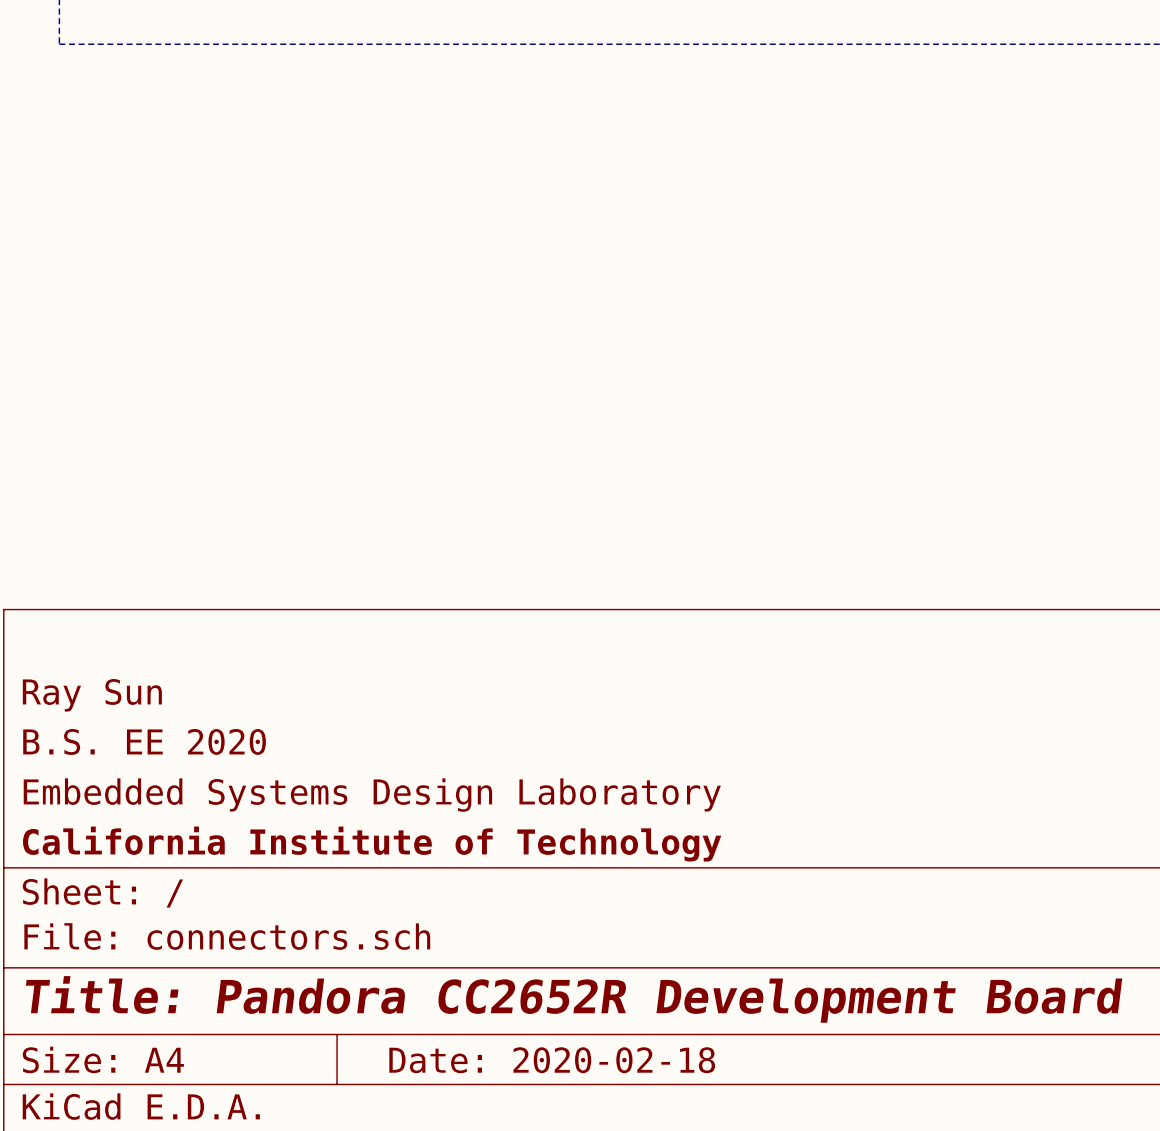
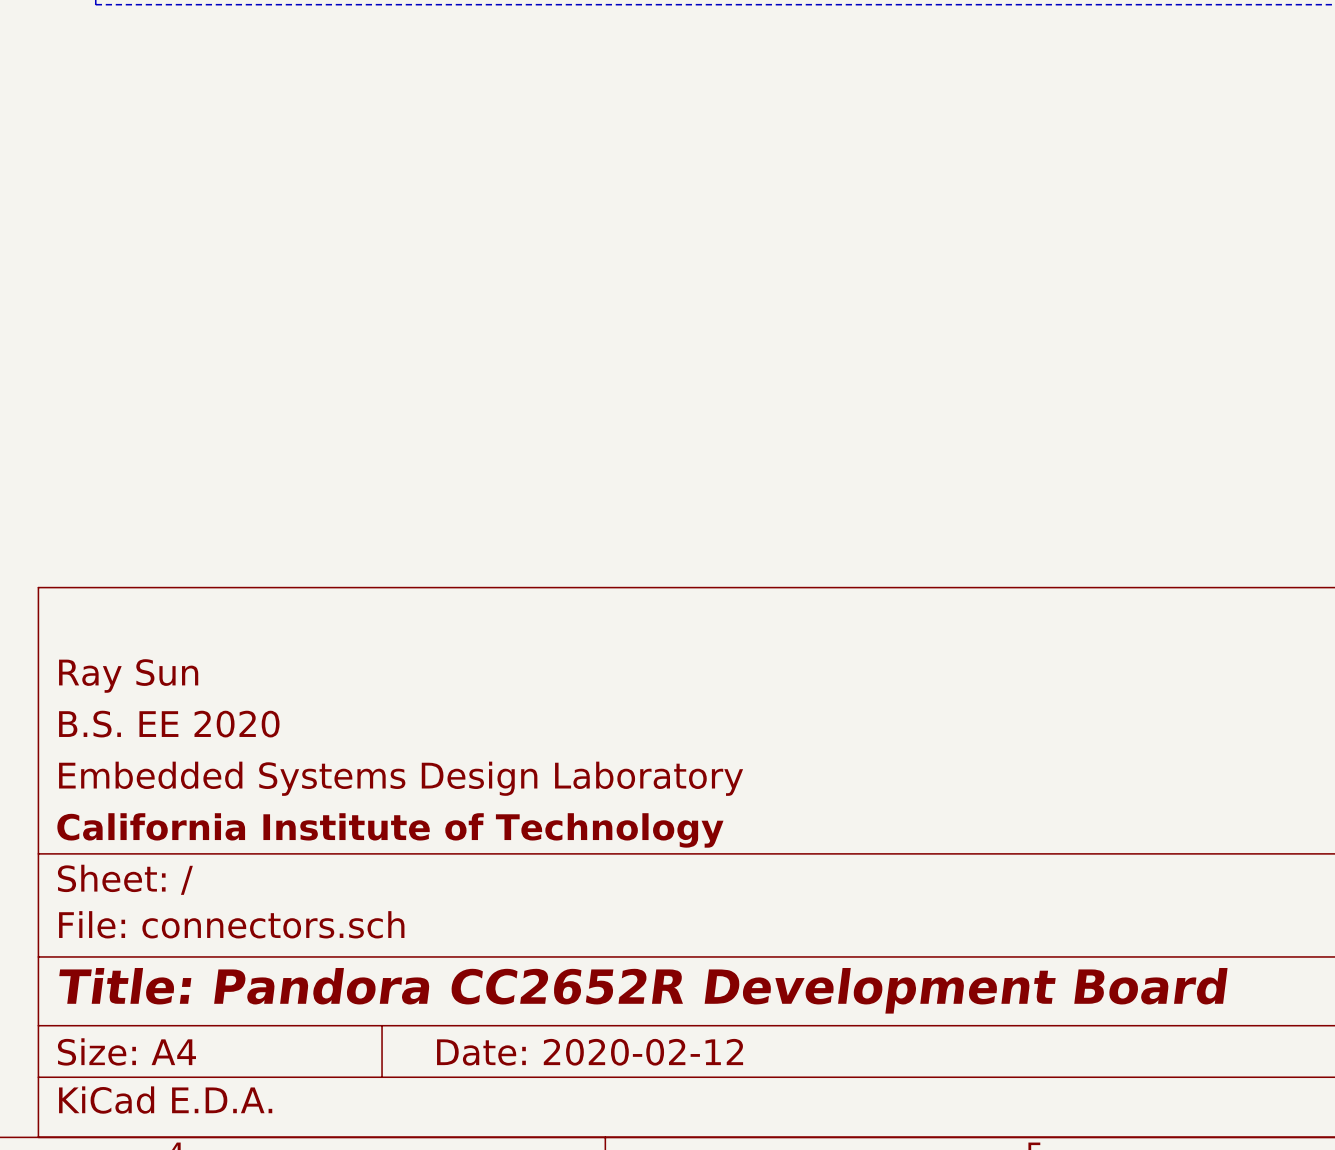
title block: Date: 2020-02-18 (552, 1060) -> Date: 2020-02-12 (590, 1052)

